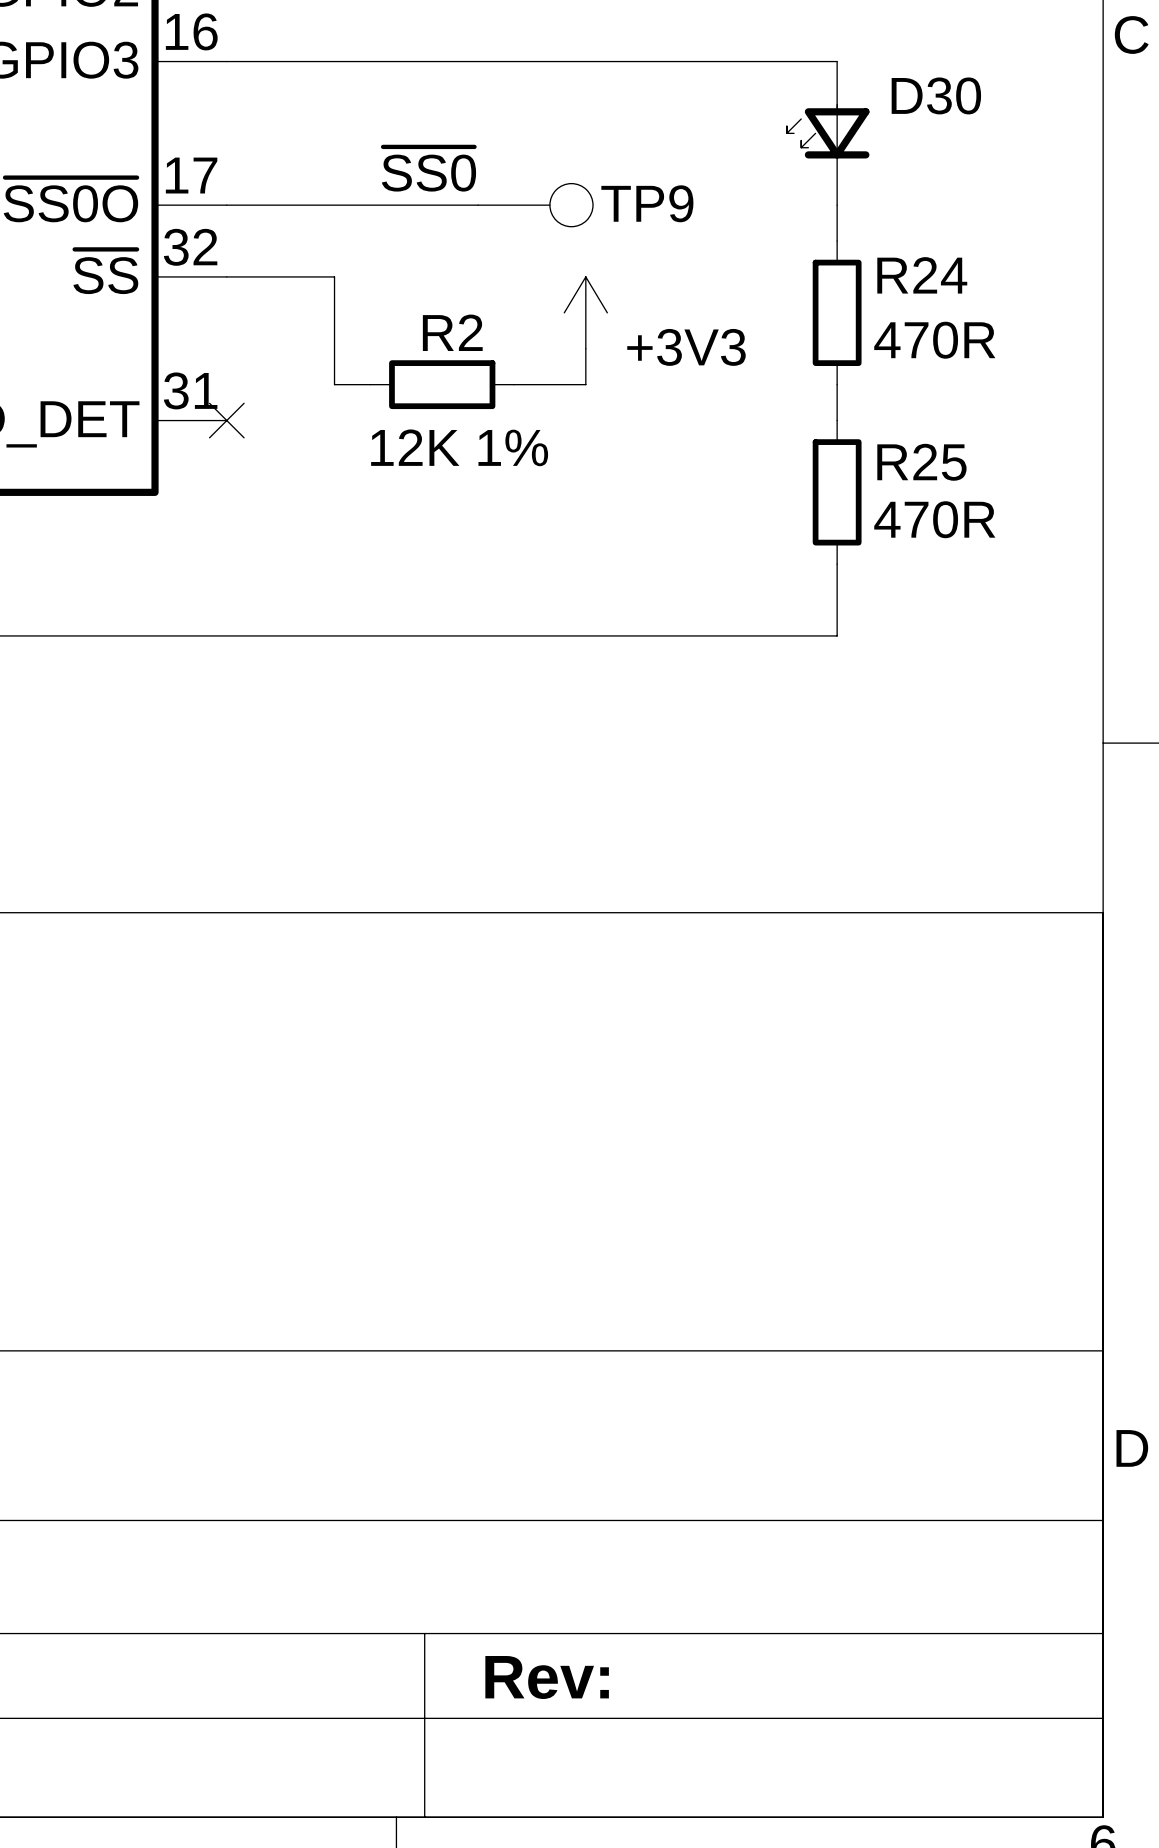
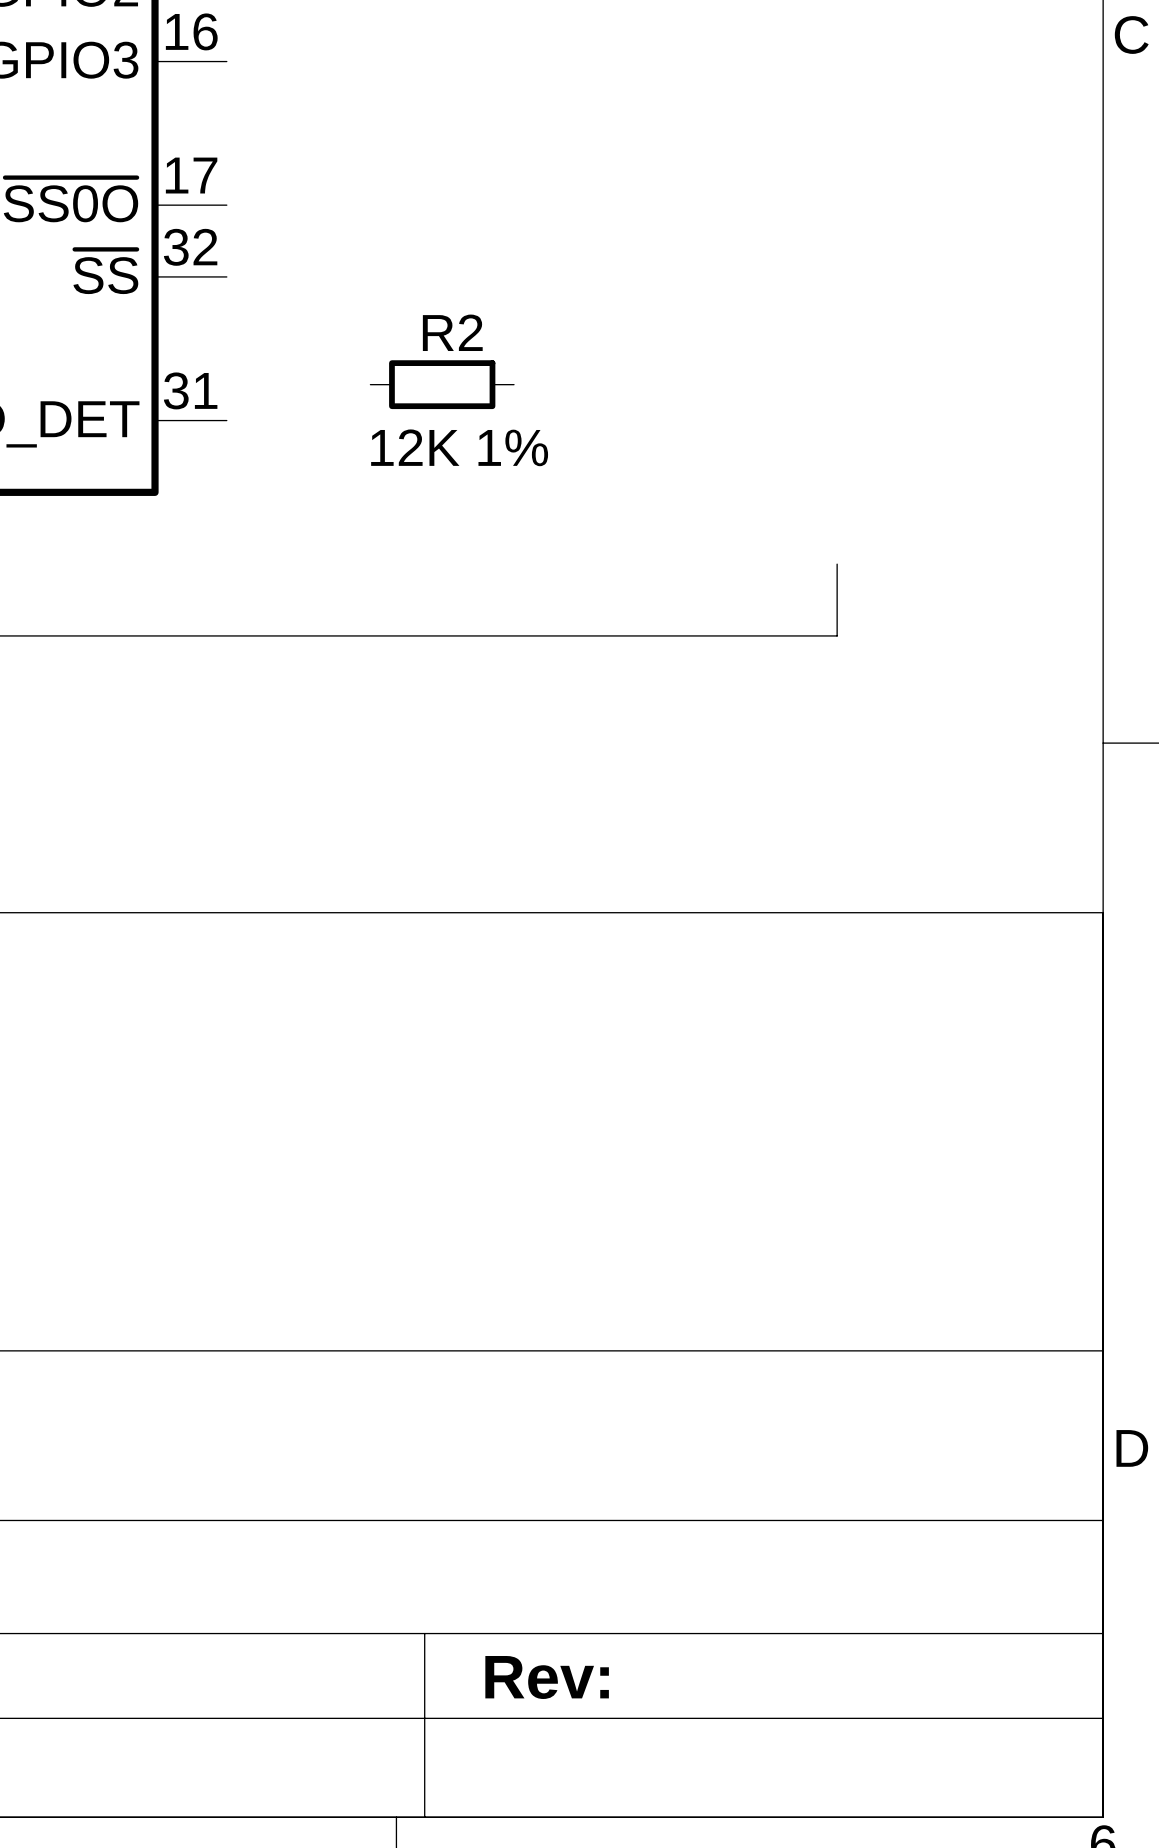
wire: (226, 61) (837, 61) -> none
D30: (828, 133) -> none
label: ~{SS0} (428, 169) -> none
wire: (226, 205) (478, 205) -> none
TP9: (535, 205) -> none
wire: (837, 205) (837, 241) -> none
wire: (226, 276) (334, 276) (334, 384) (370, 384) -> none
power symbol: +3V3 (585, 312) -> none
R24: 470R (837, 312) -> none
wire: (585, 348) (585, 384) (514, 384) -> none
wire: (837, 384) (837, 420) -> none
no-connect mark: (226, 420) -> none
R25: 470R (837, 492) -> none

